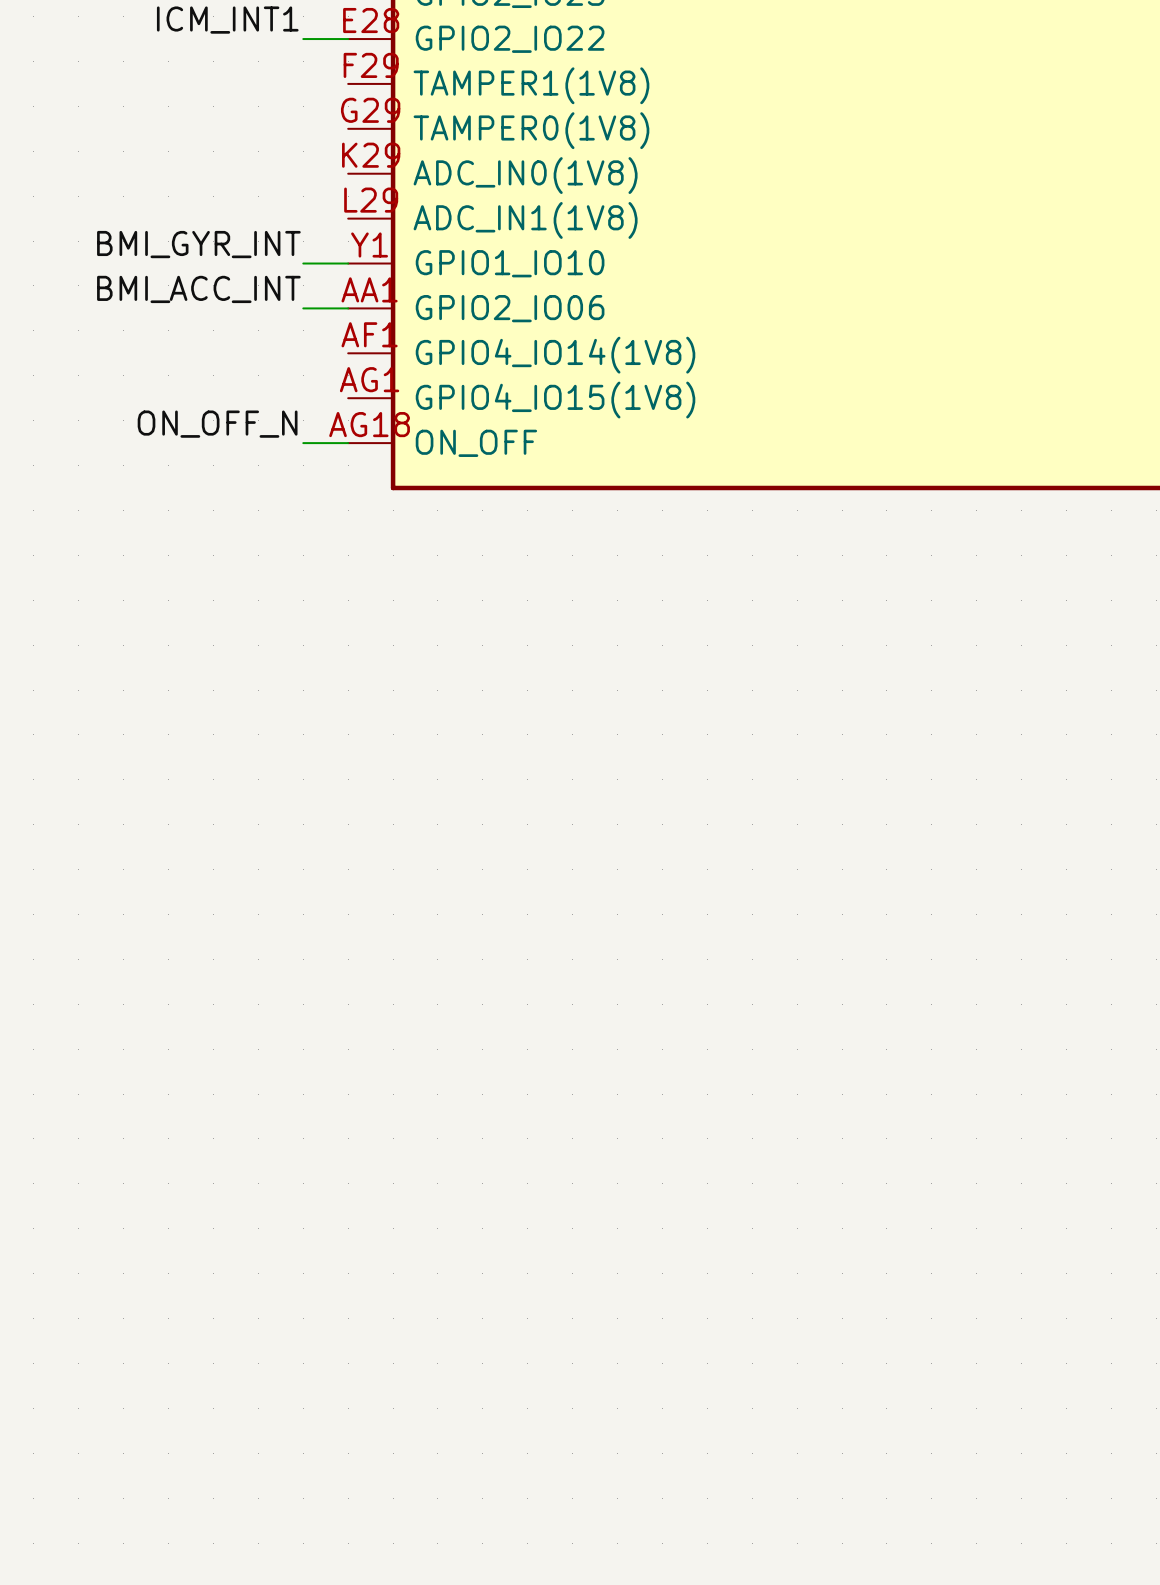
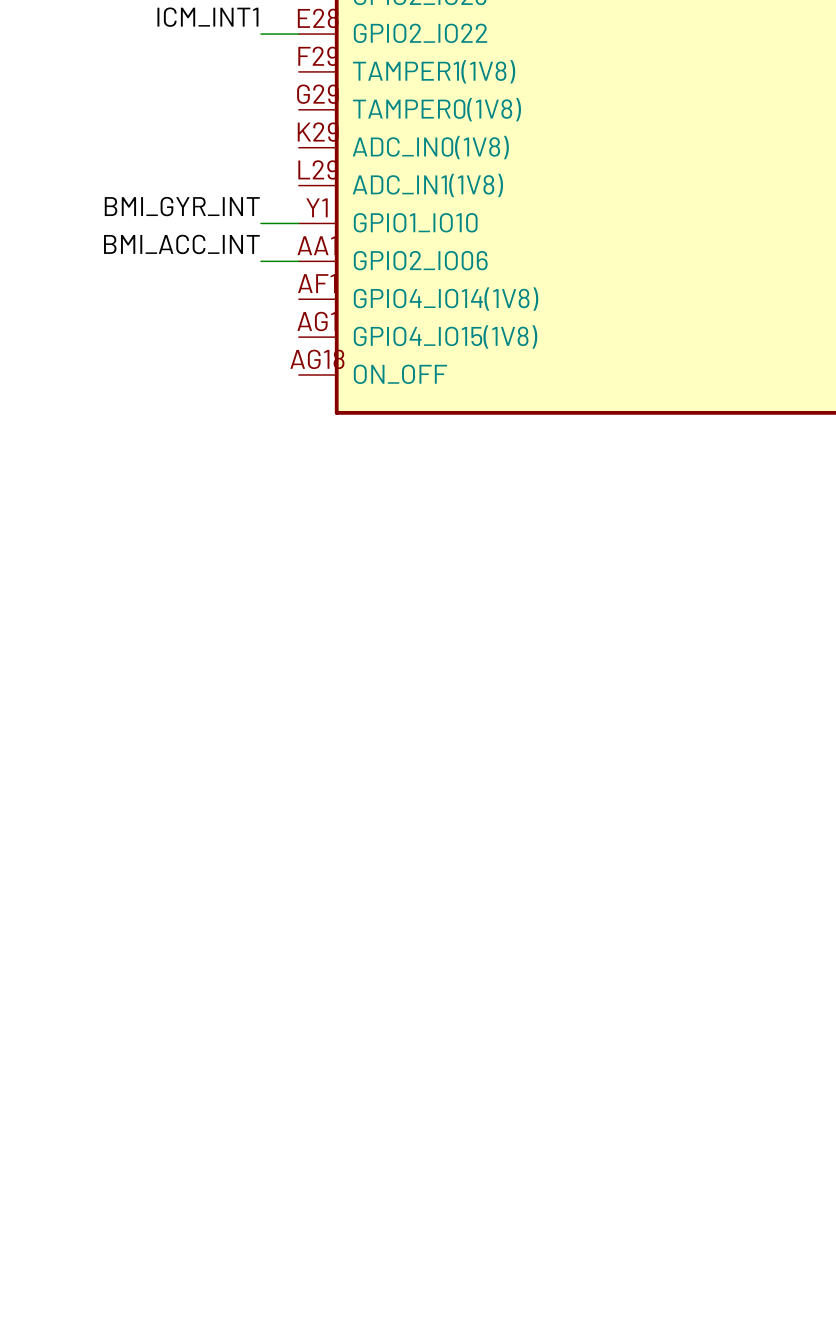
label: ON_OFF_N (217, 424) -> none
wire: (303, 443) (348, 443) -> none

